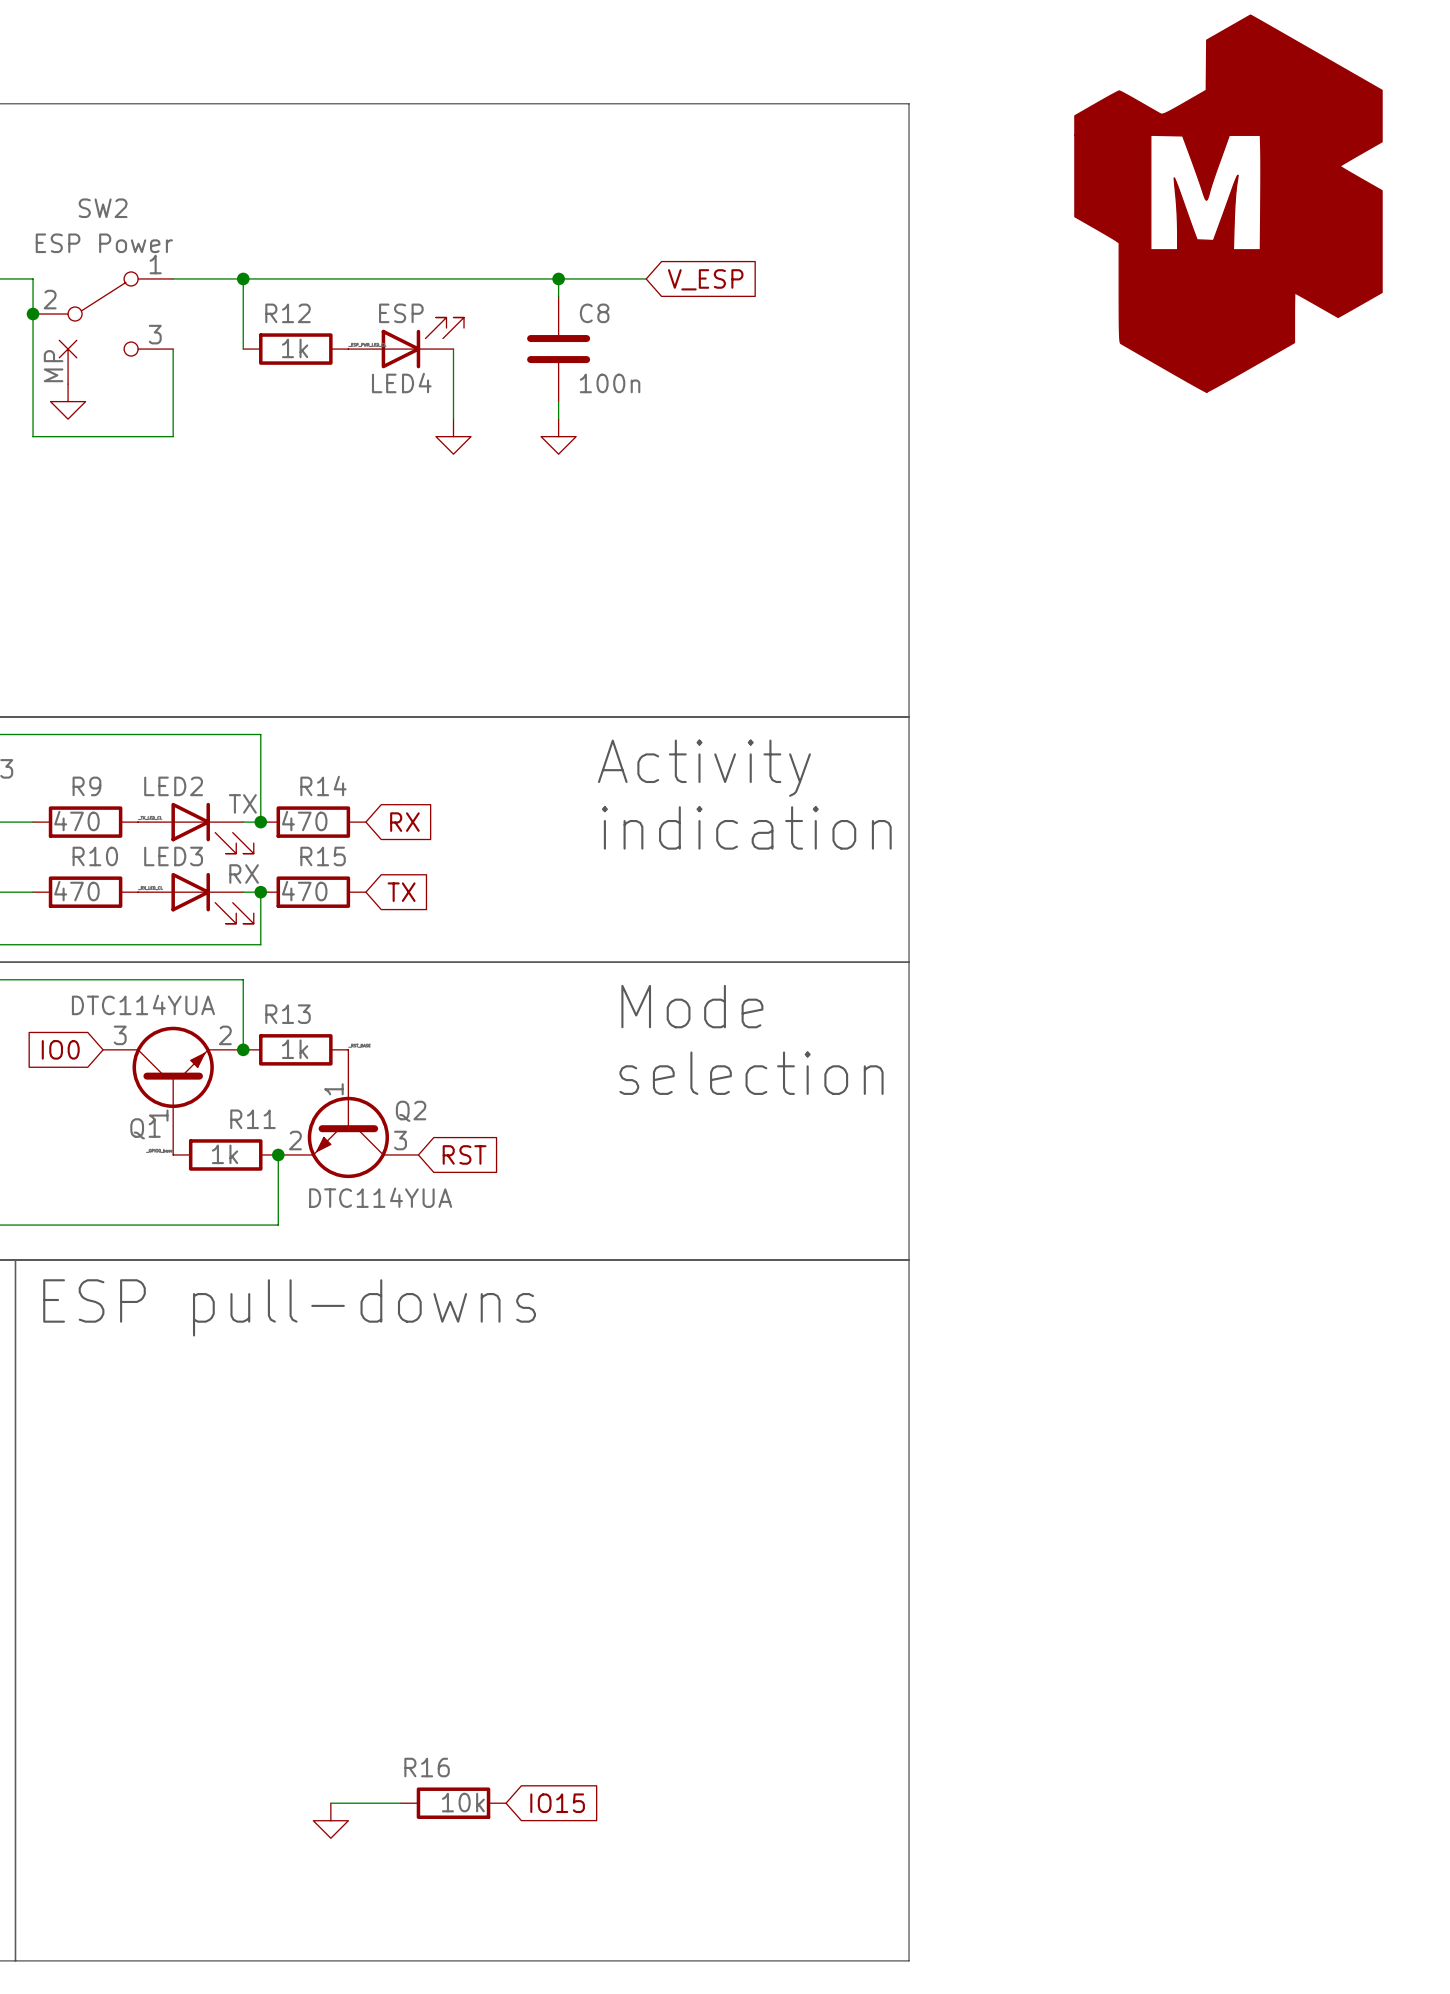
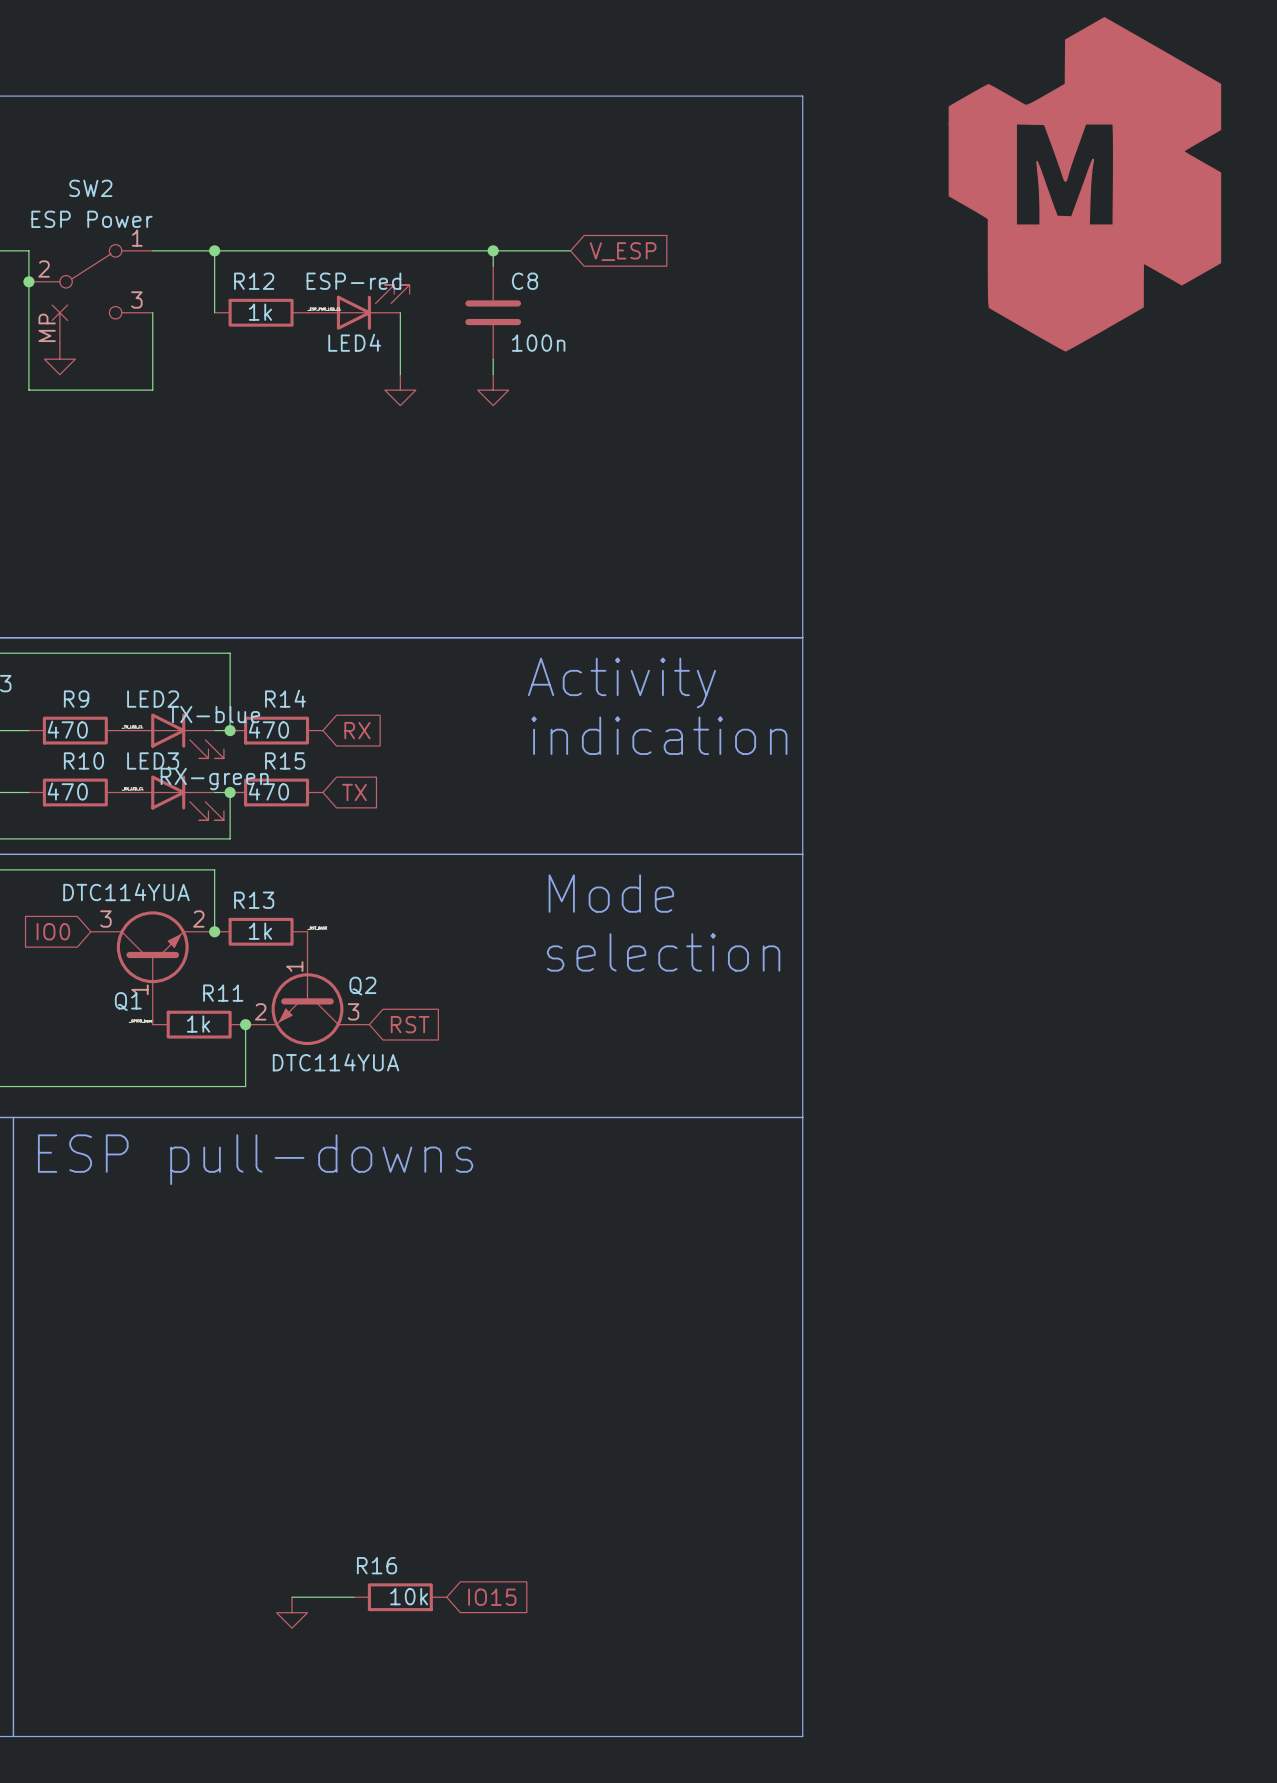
LED4 value: ESP (401, 313) -> ESP-red (353, 281)
LED2 value: TX (242, 803) -> TX-blue (213, 714)
LED3 value: RX (244, 874) -> RX-green (214, 779)

